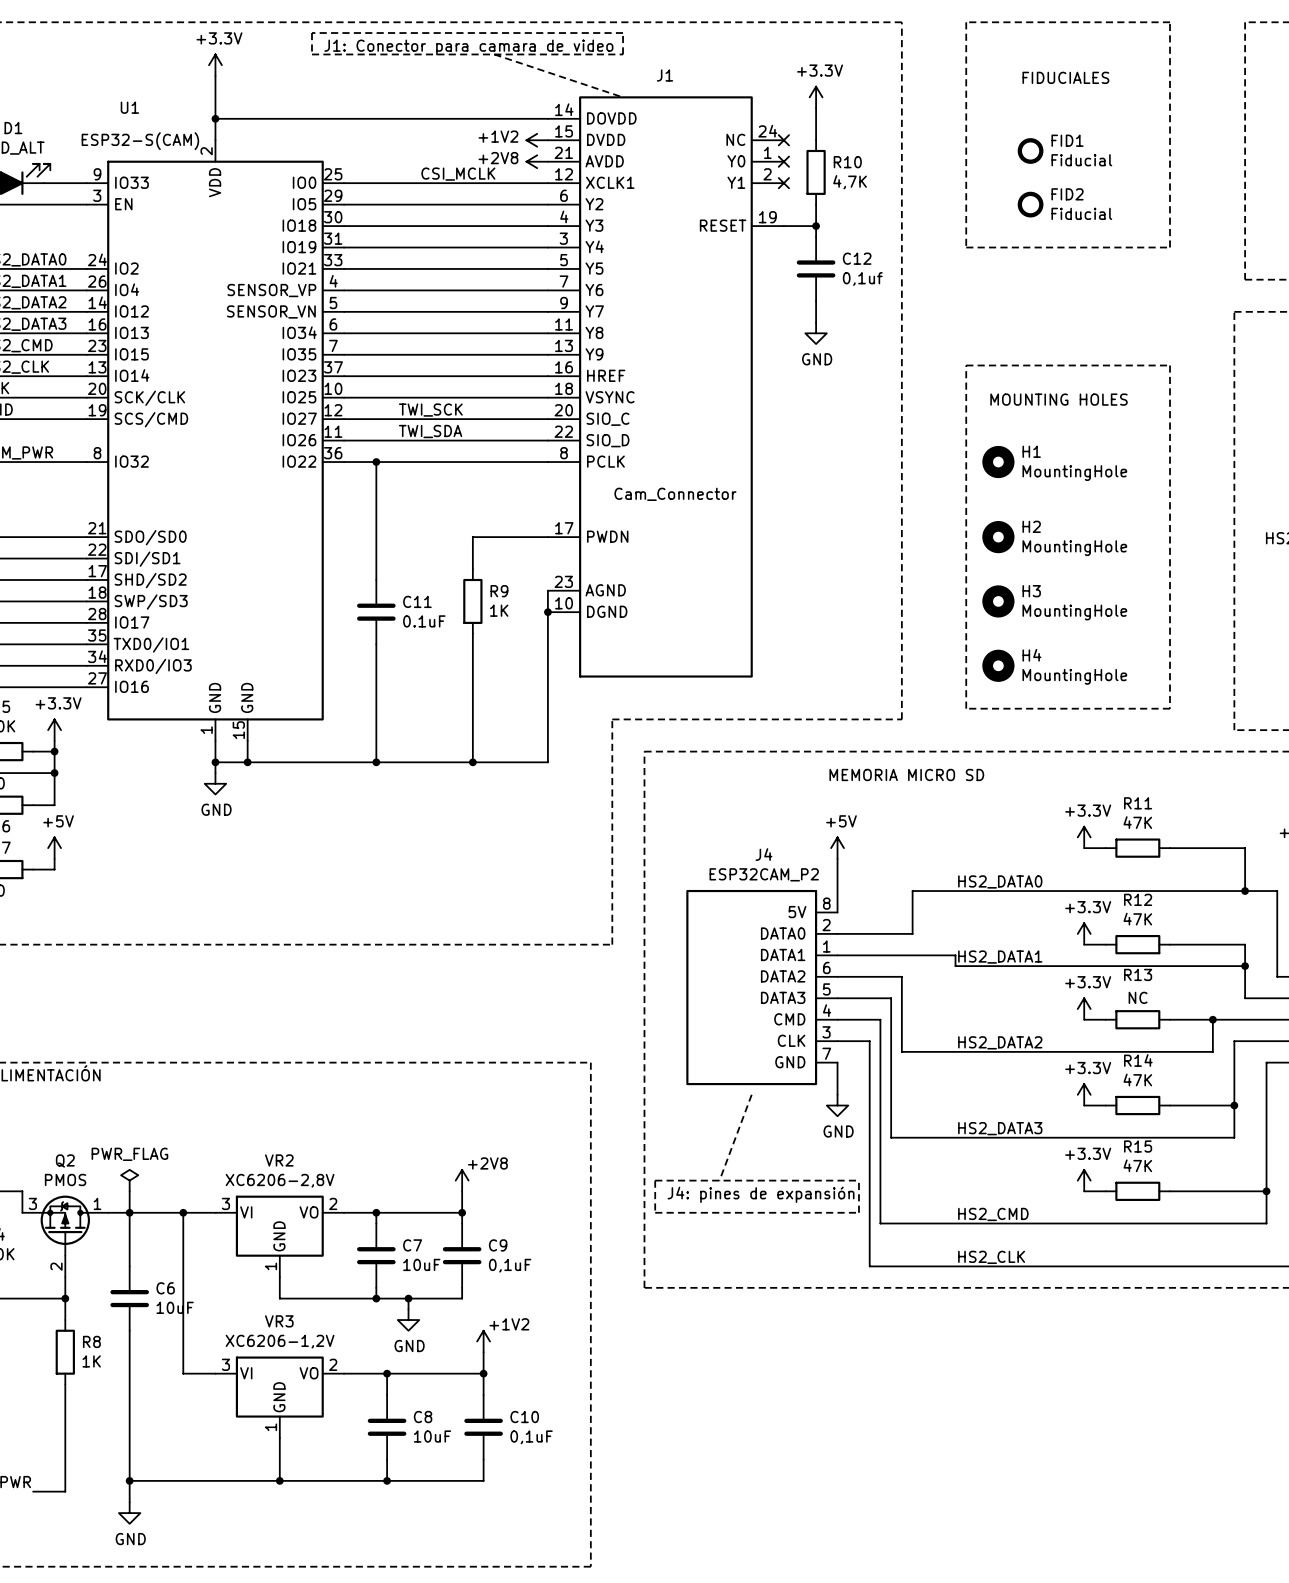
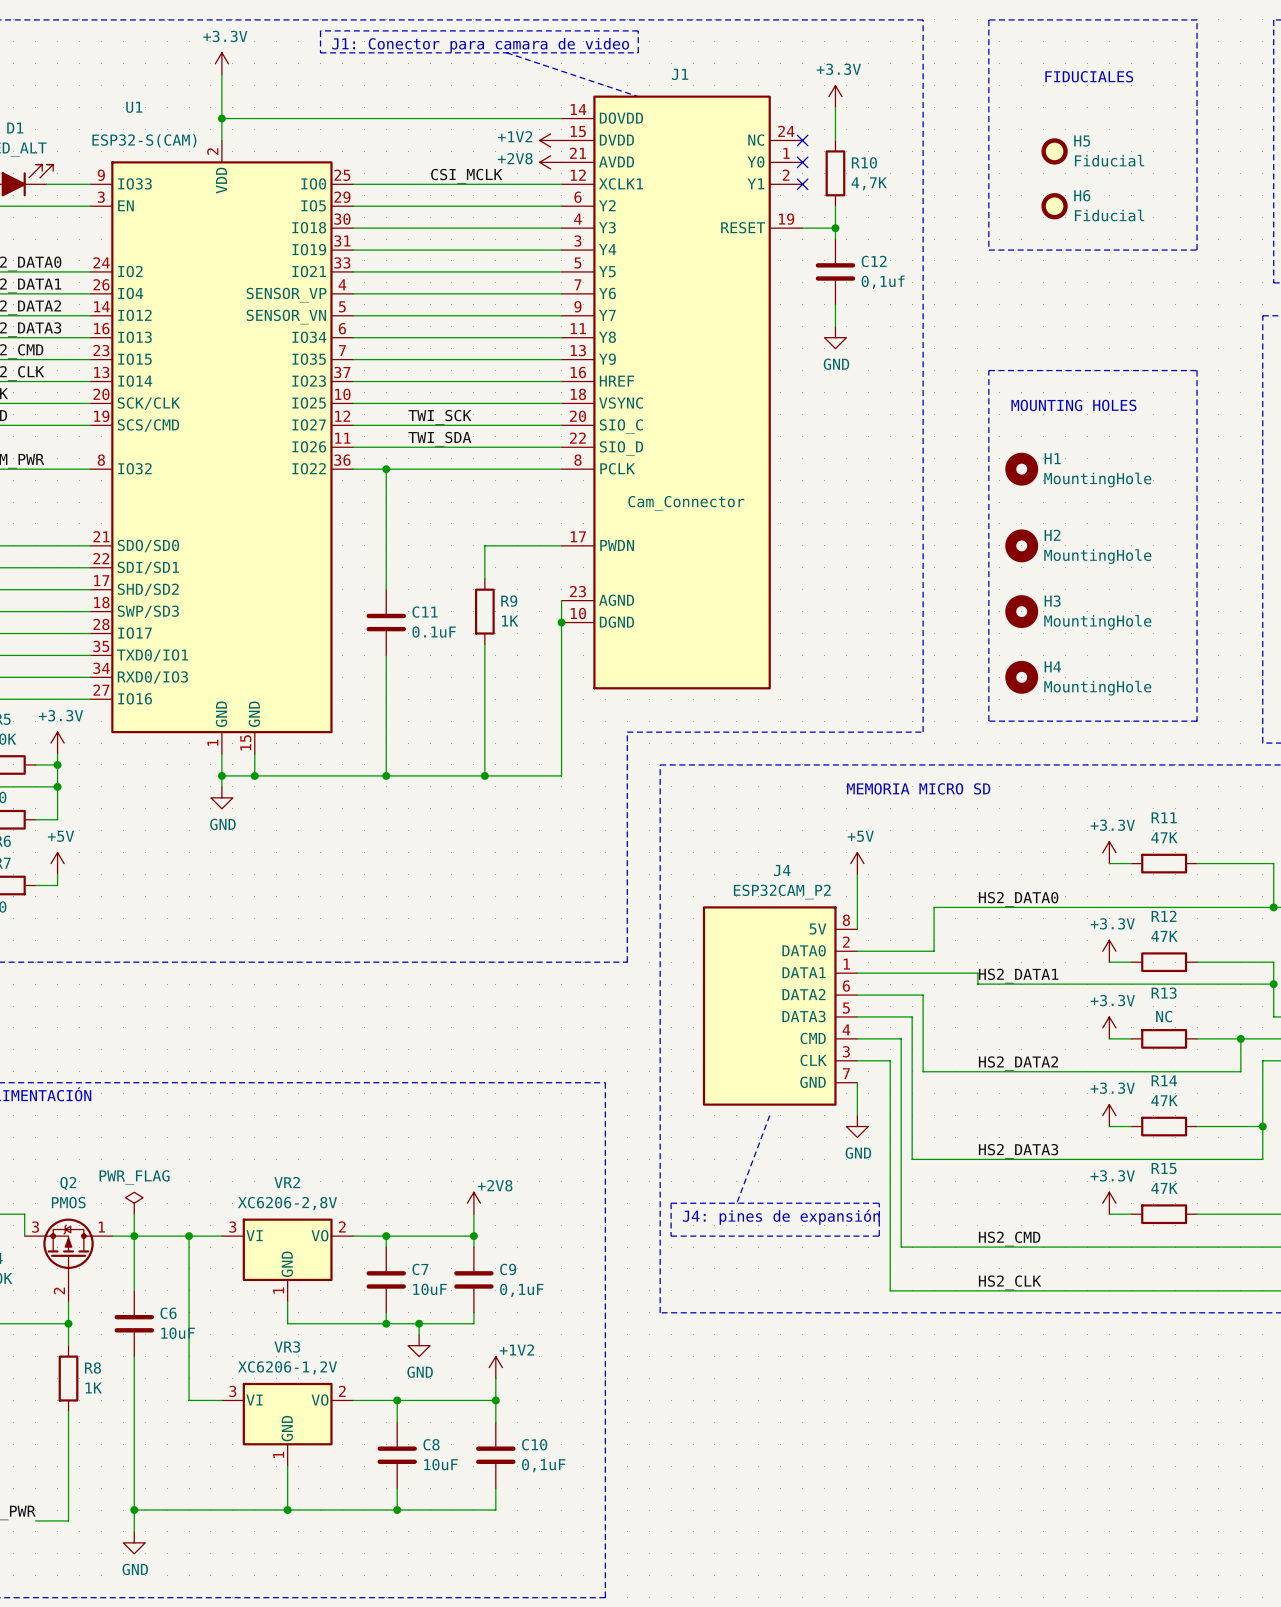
FID1 name: FID1 (1067, 140) -> H5 (1082, 141)
FID2 name: FID2 (1067, 194) -> H6 (1082, 195)

